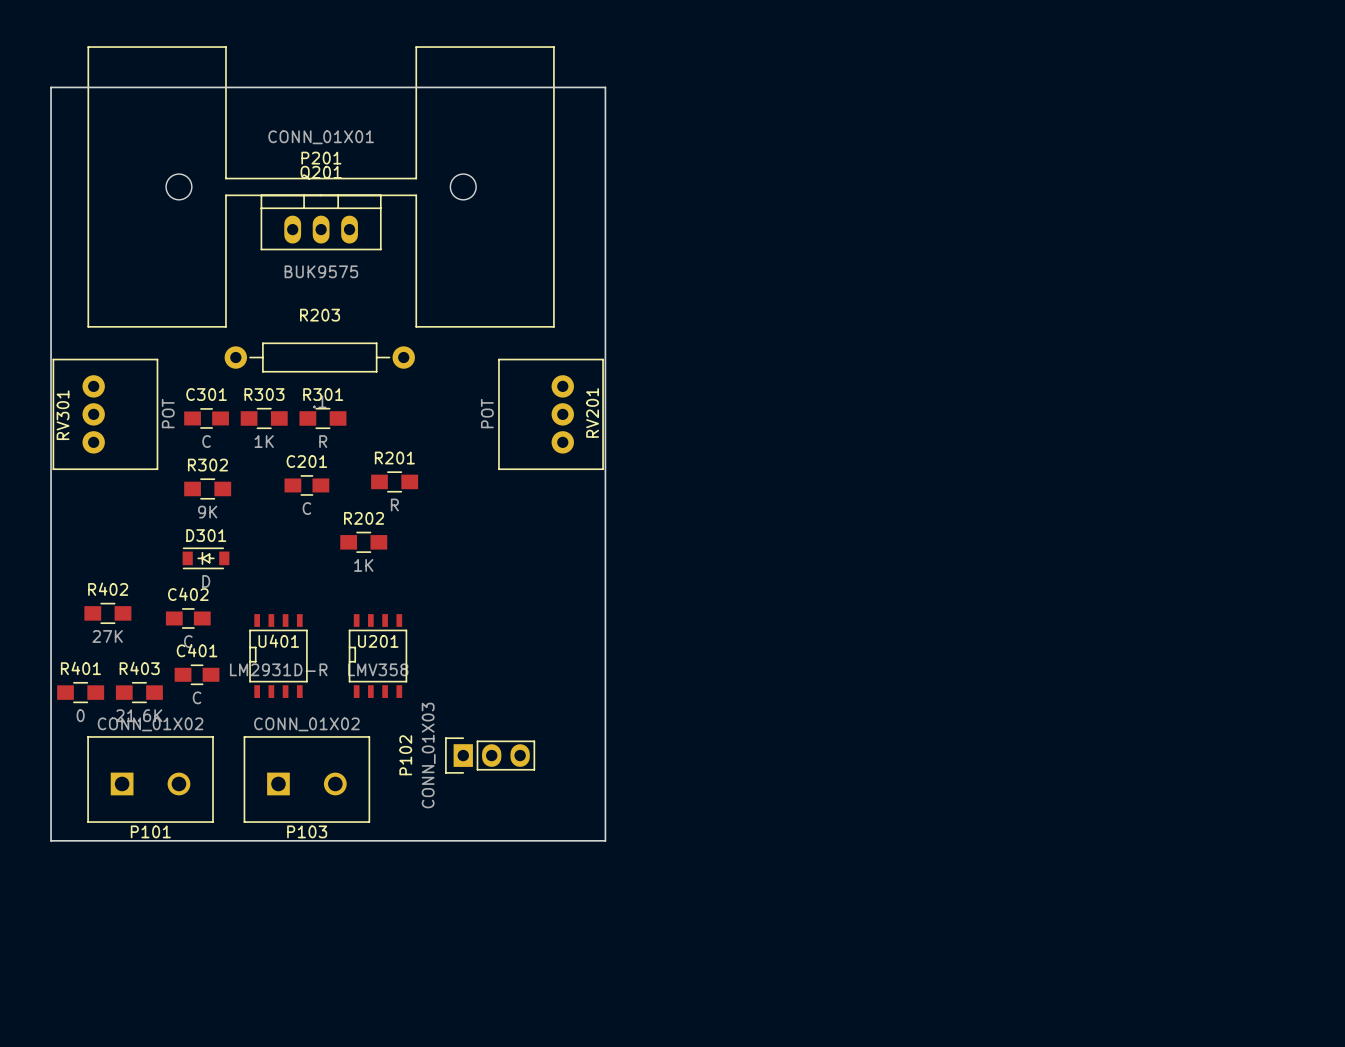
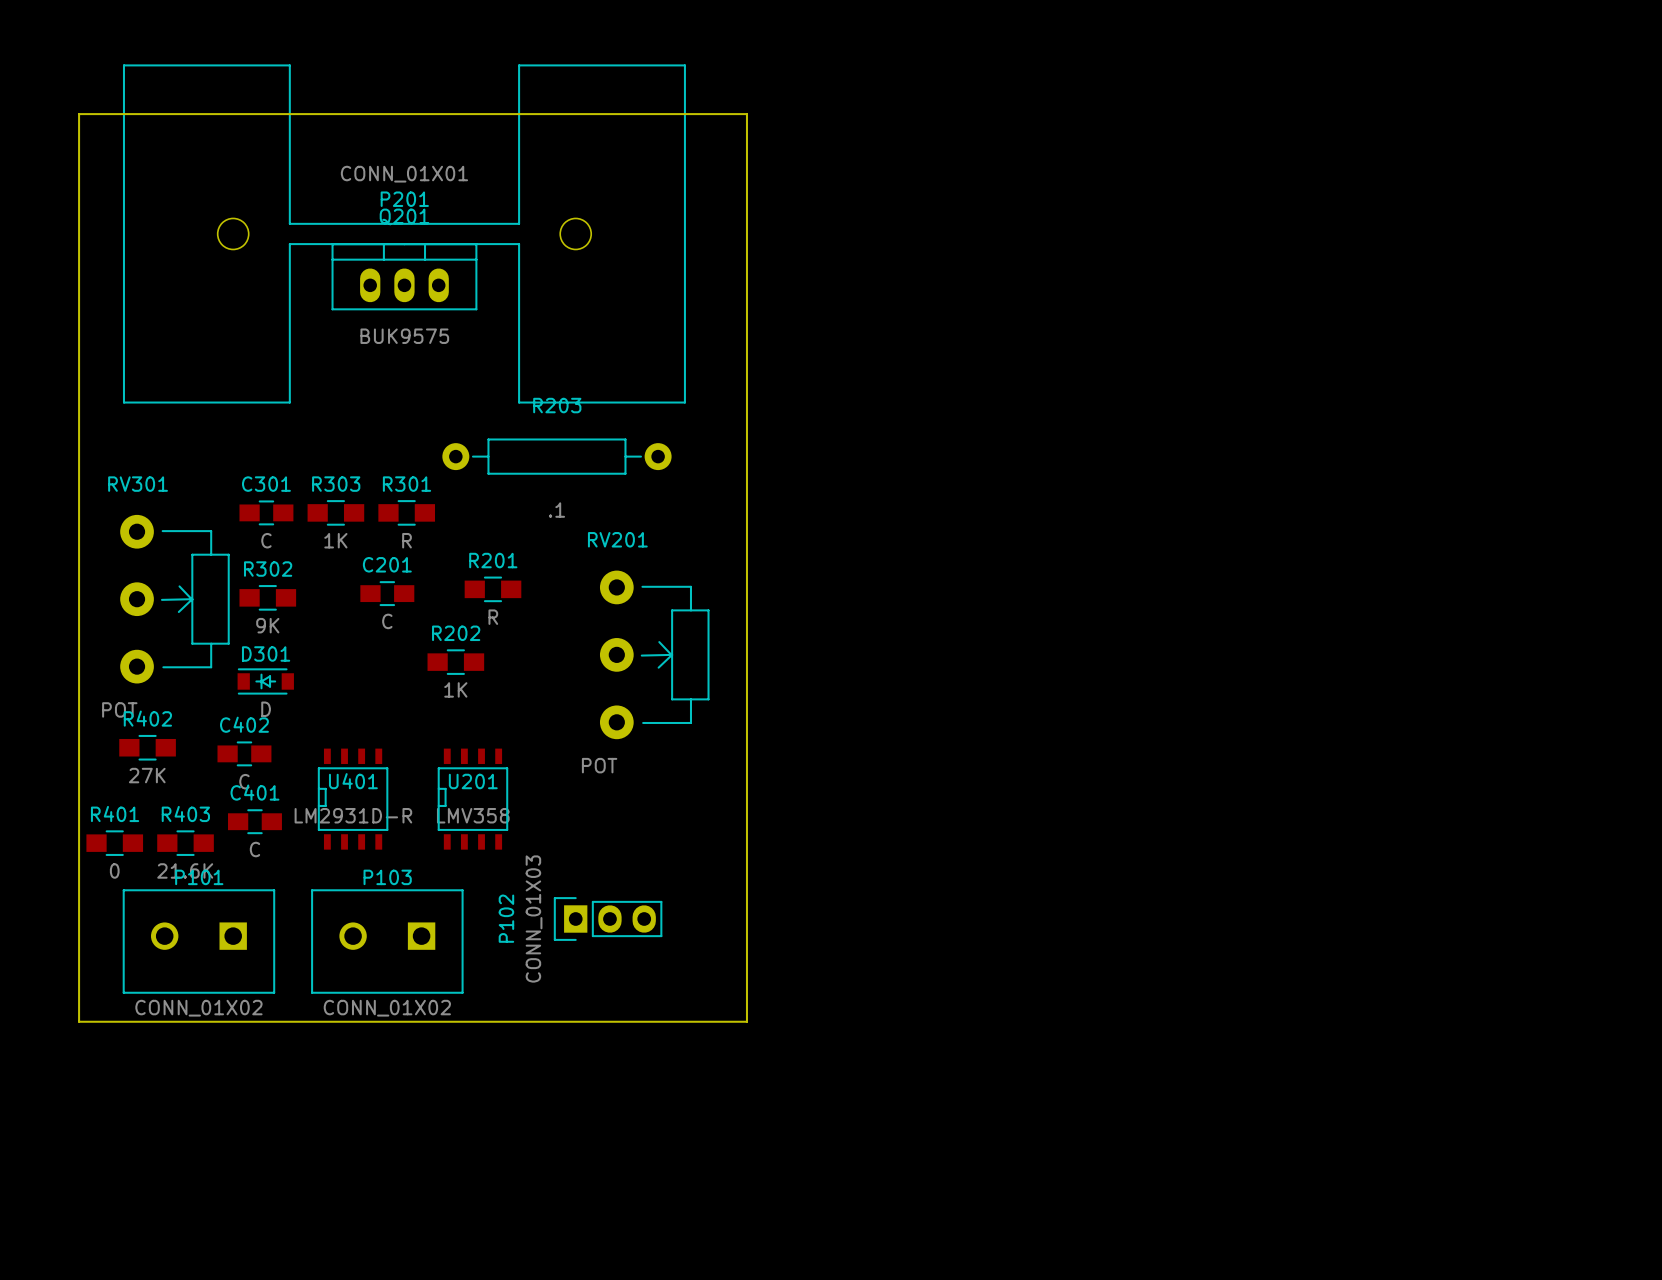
RV301 footprint: [52, 346, 159, 483] -> [120, 514, 230, 684]
RV201 footprint: [498, 346, 604, 483] -> [599, 570, 710, 740]
R203 position: (319, 357) -> (556, 456)
RV201 name position: RV201 (592, 412) -> RV201 (617, 539)
RV301 value position: POT (168, 413) -> POT (119, 709)
RV201 value position: POT (487, 413) -> POT (599, 765)
RV301 name position: RV301 (63, 415) -> RV301 (138, 484)
P101 rotation: 0° (150, 779) -> 180° (198, 941)
P103 rotation: 0° (306, 779) -> 180° (387, 941)

